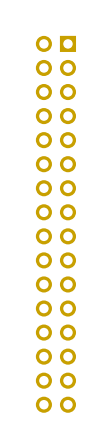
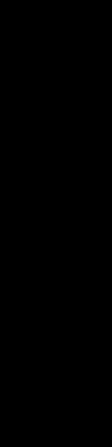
part: (55, 224) -> none

